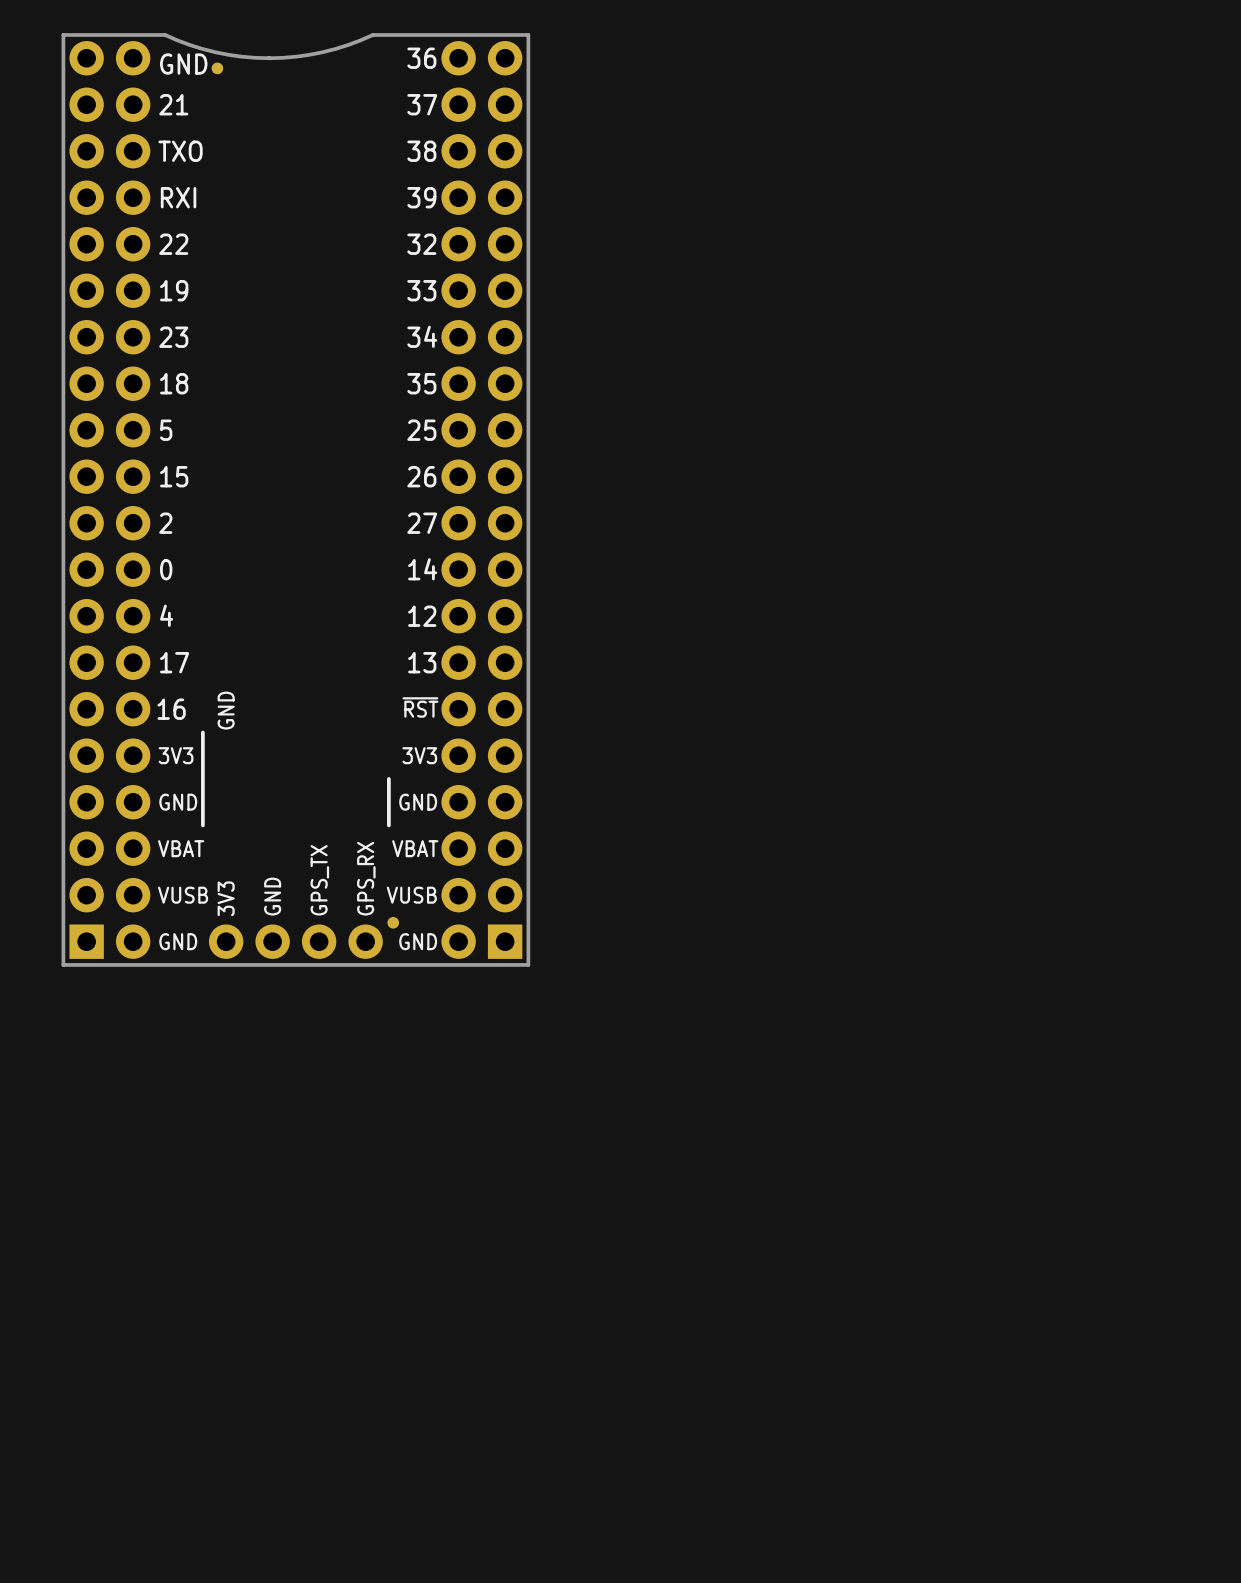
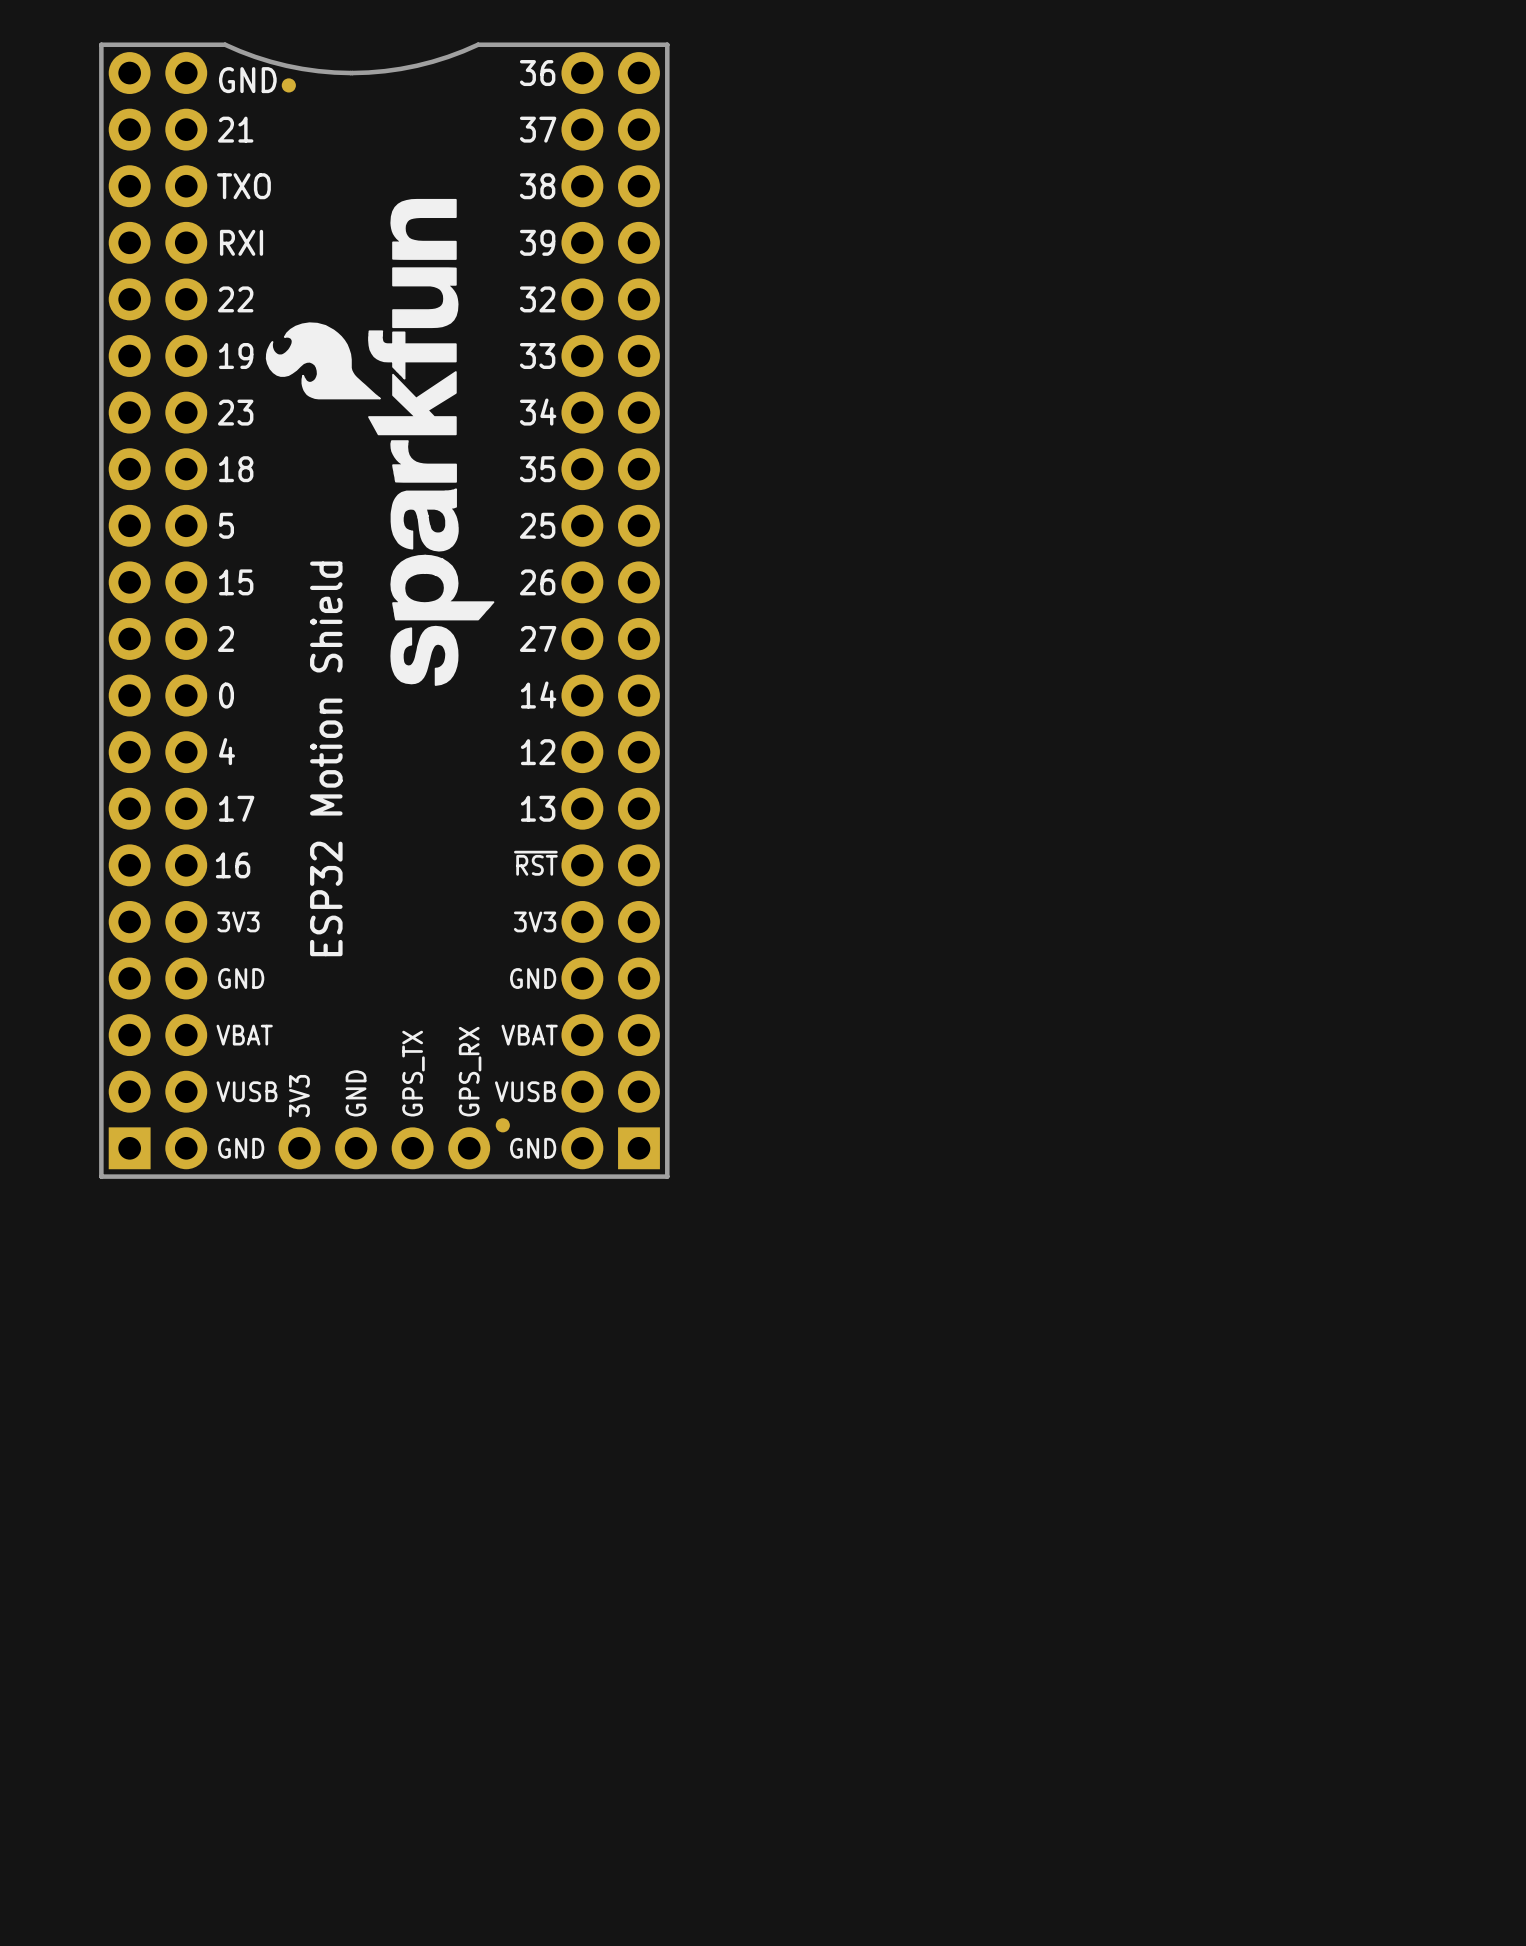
drawing: none -> [265, 198, 495, 686]
text: none -> ESP32 Motion Shield (326, 758)
text: GND (226, 710) -> none
line: (202, 732) (202, 825) -> none
line: (388, 778) (388, 825) -> none

